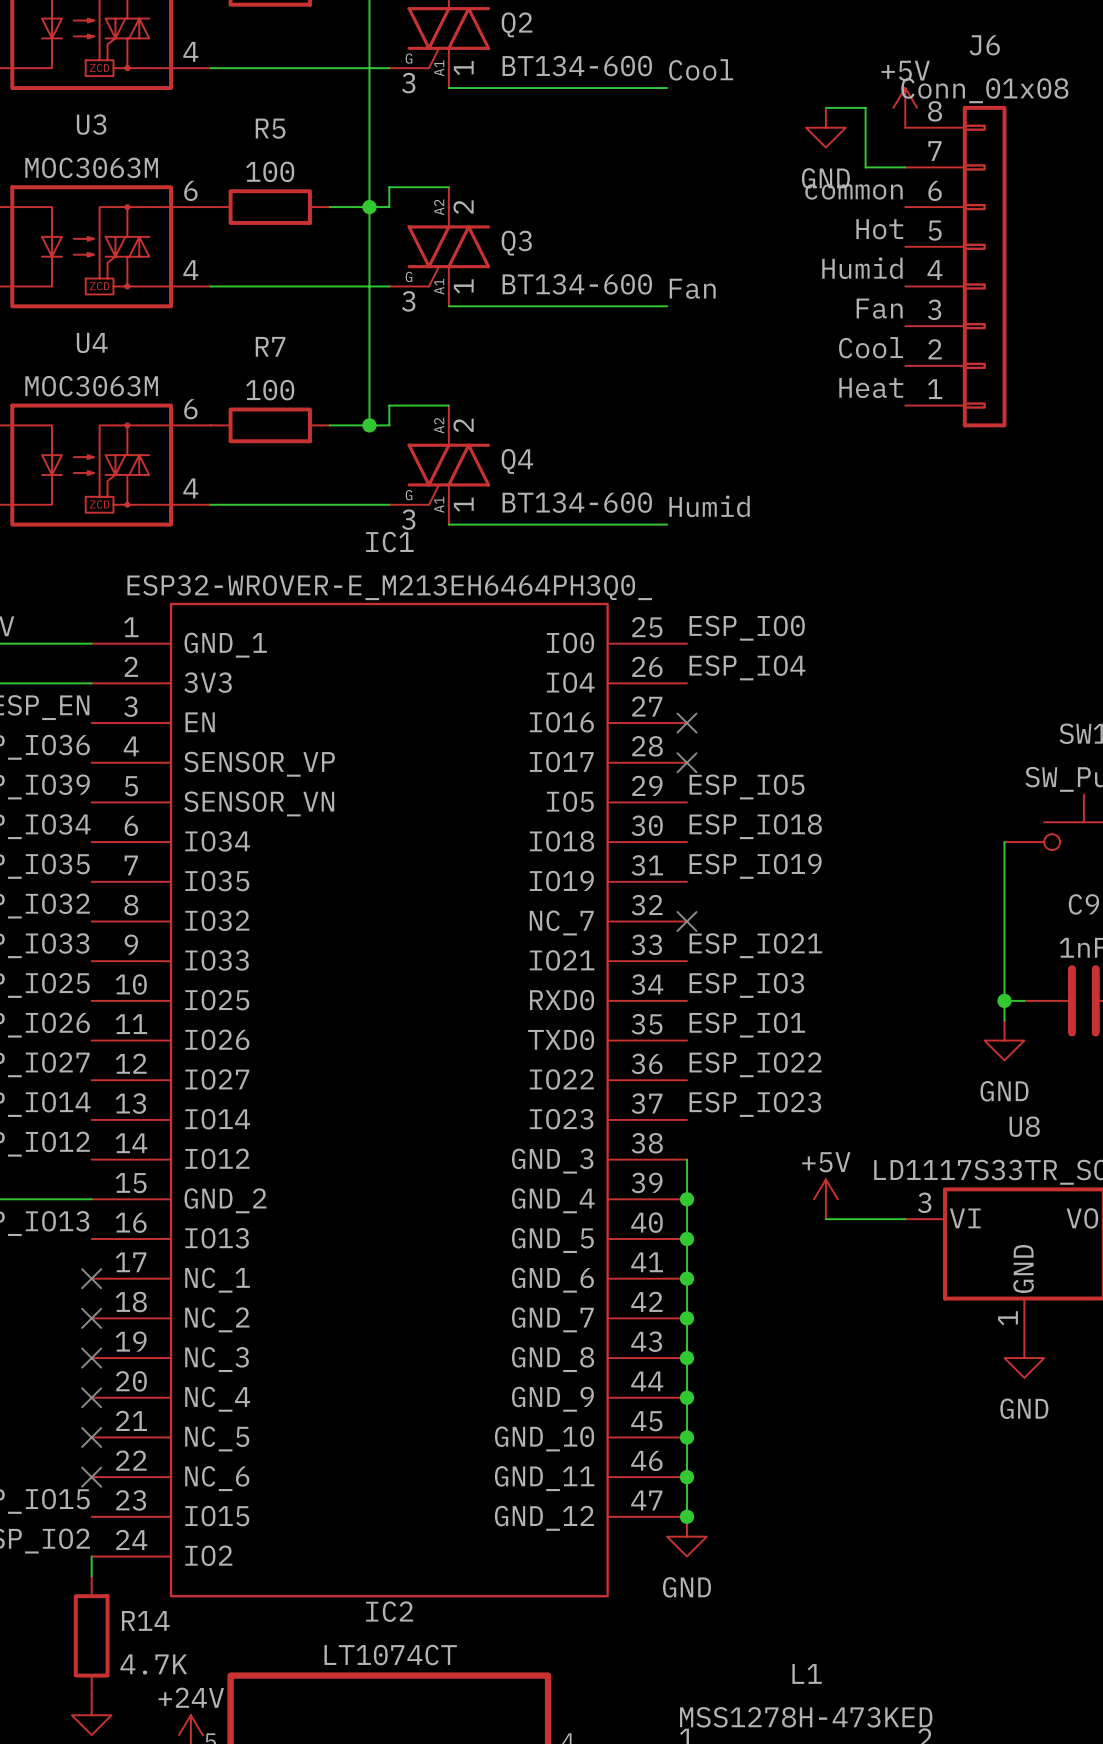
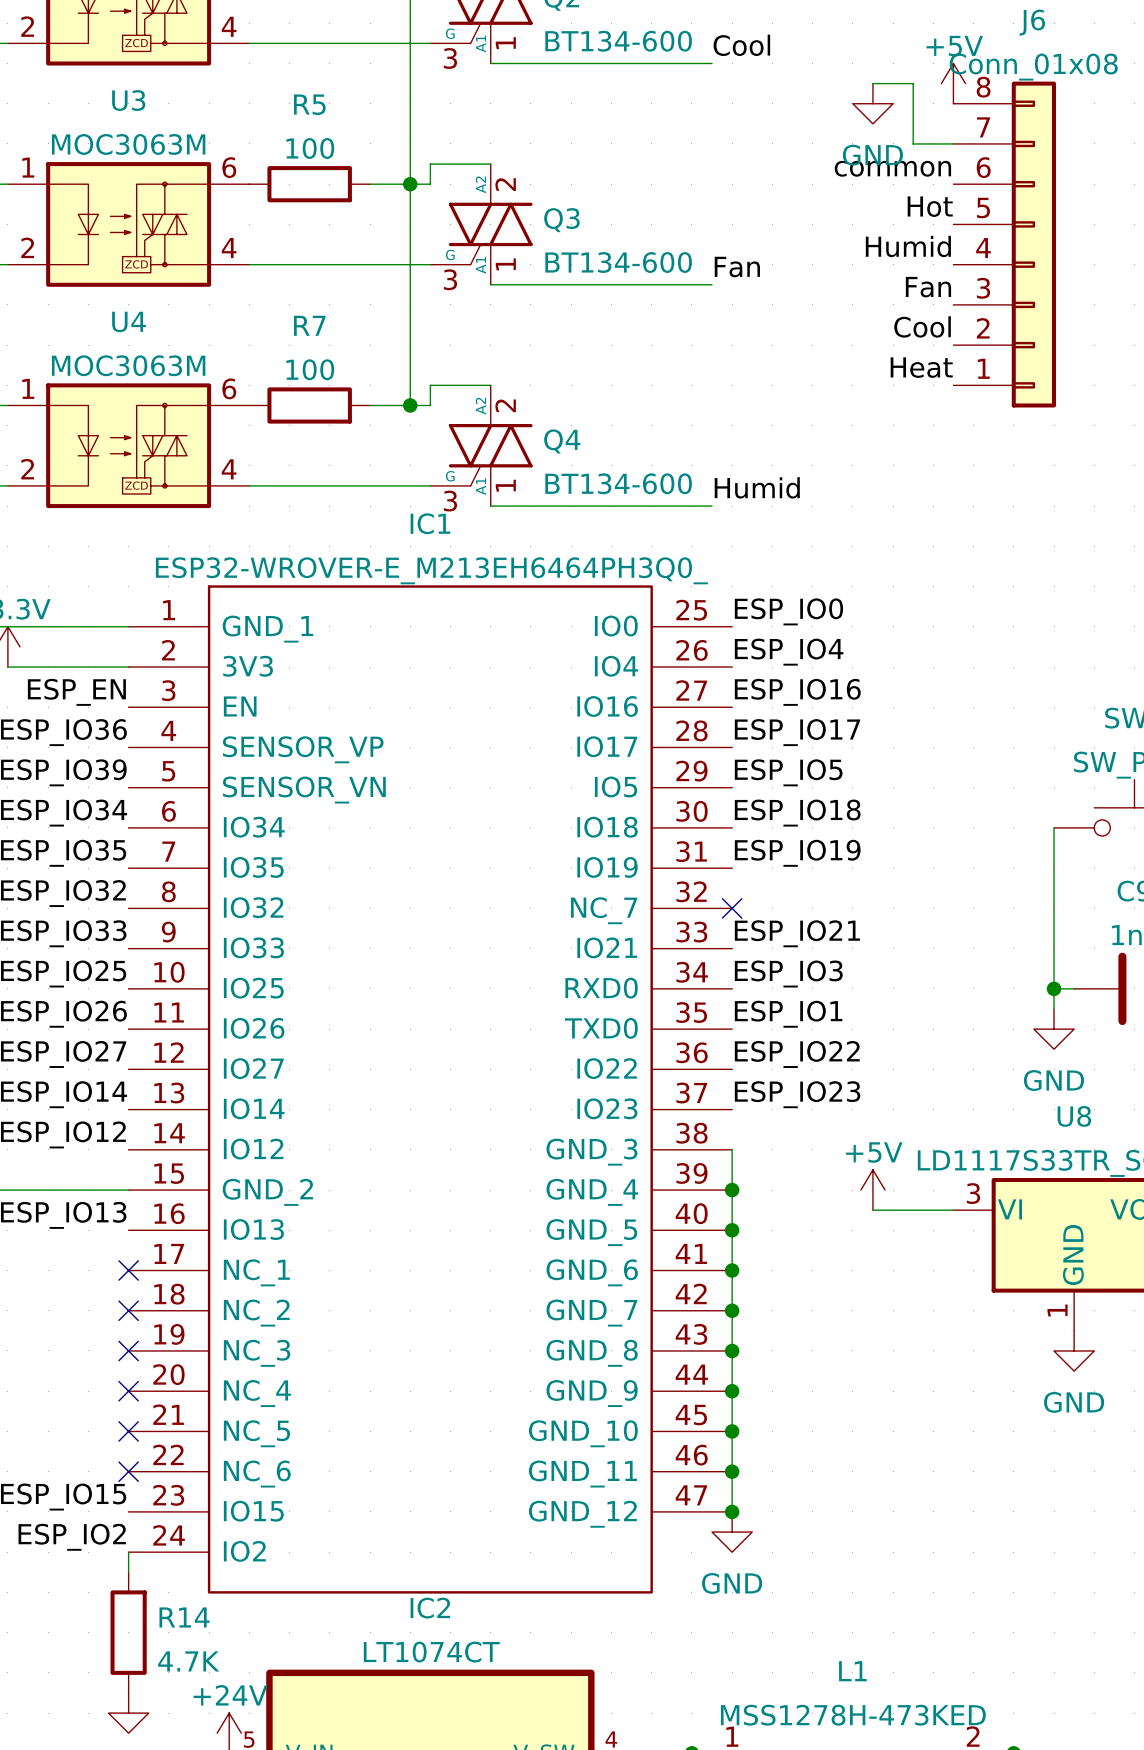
label: none -> ESP_IO16 (797, 692)
no-connect mark: (686, 723) -> none
label: none -> ESP_IO17 (797, 732)
no-connect mark: (686, 762) -> none

